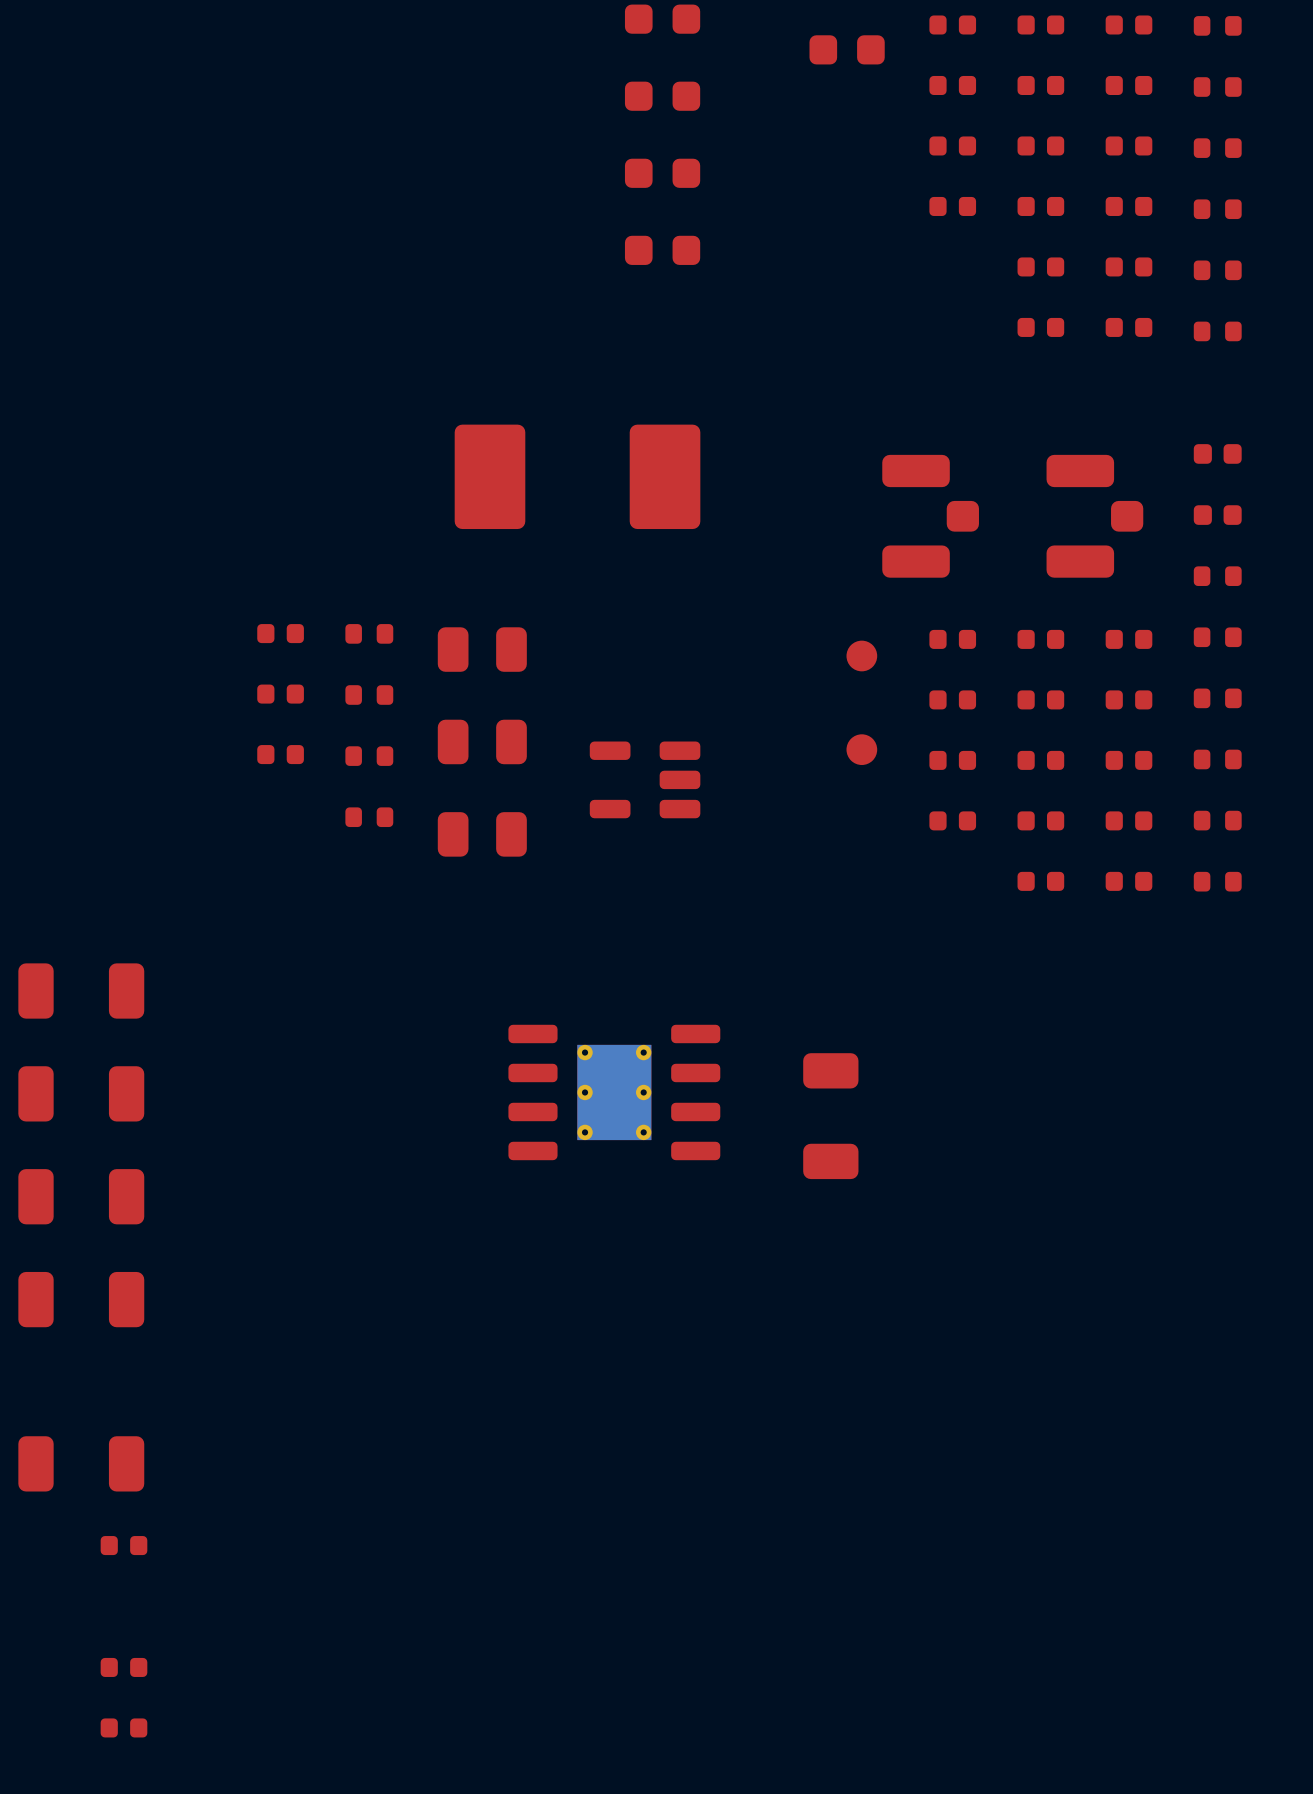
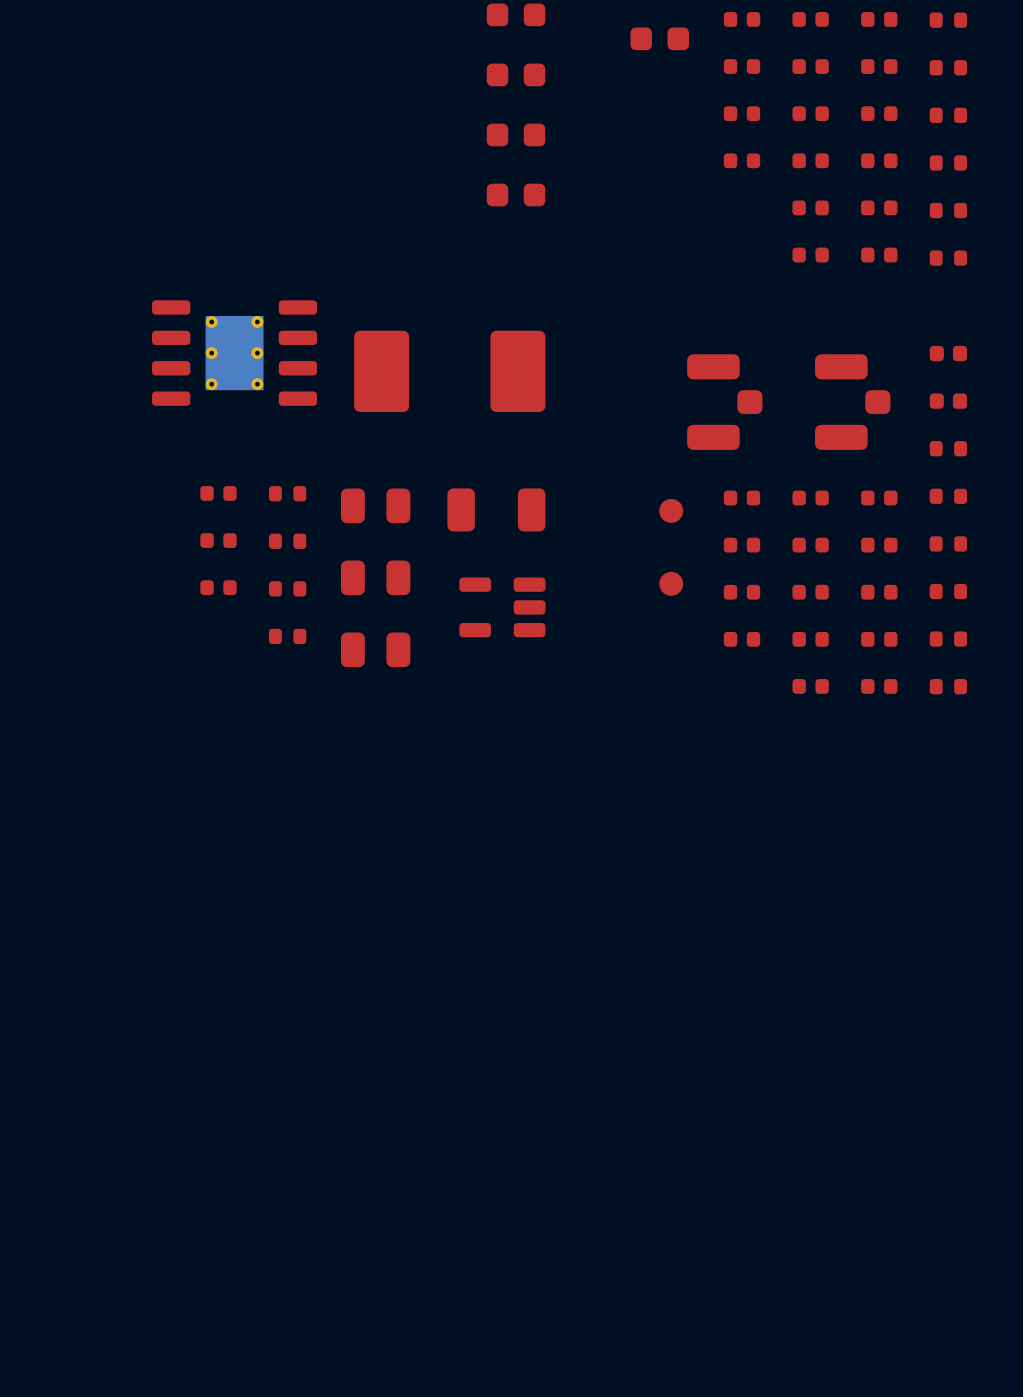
part: none -> (496, 509)
part: (81, 991) -> none
part position: (614, 1092) -> (234, 353)
part: (81, 1093) -> none
part: (830, 1116) -> none
part: (81, 1196) -> none
part: (81, 1299) -> none
part: (81, 1463) -> none
part: (123, 1545) -> none
part: (123, 1667) -> none
part: (123, 1727) -> none

